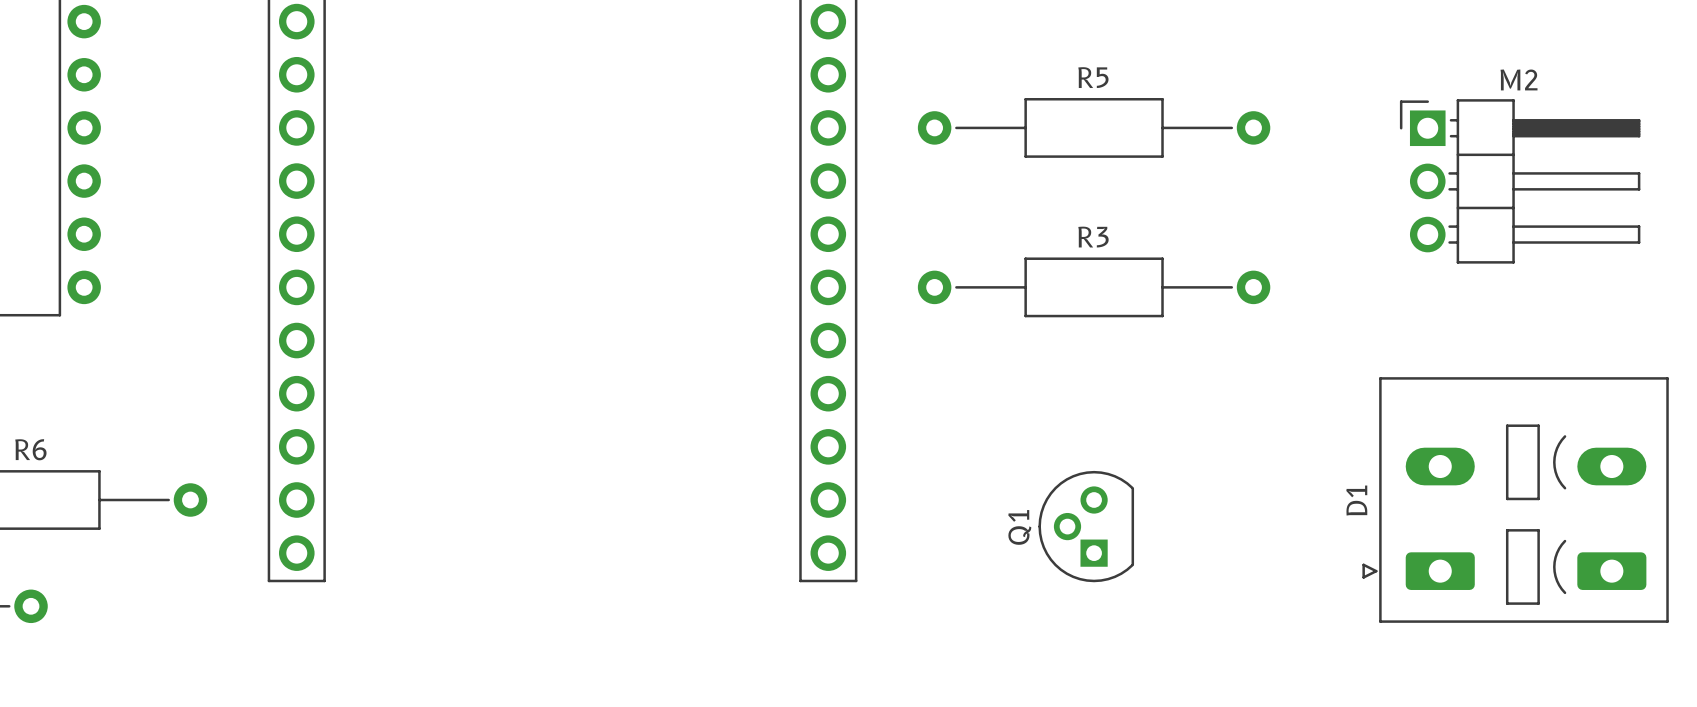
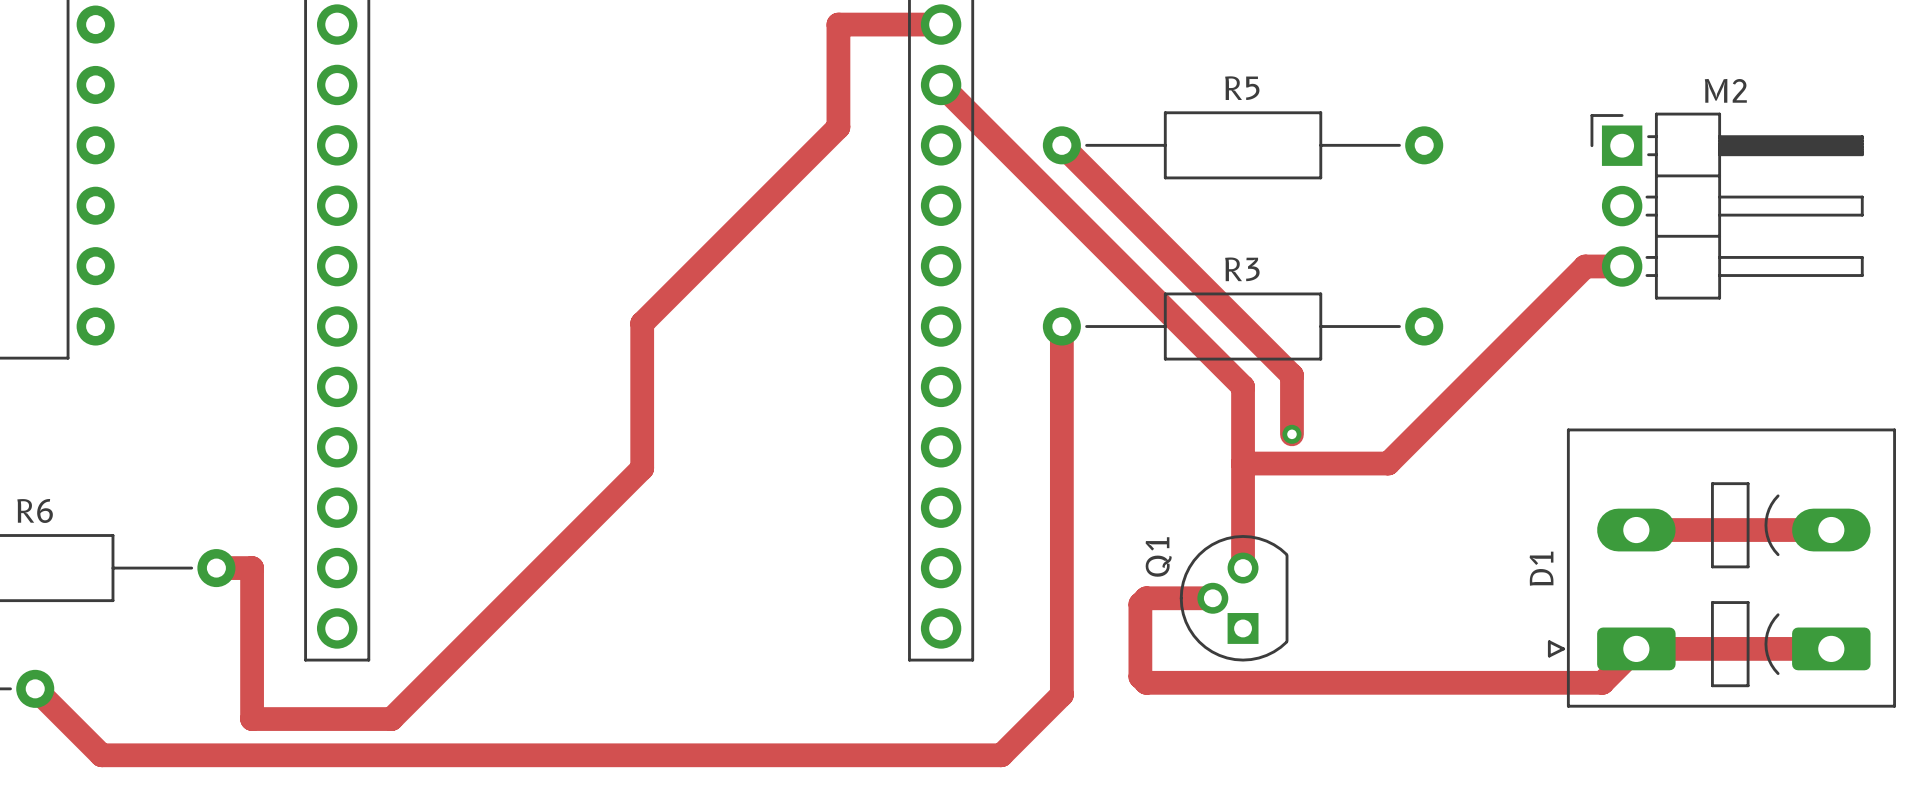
track: none -> (941, 24) (838, 24) (838, 127) (642, 323) (642, 468) (391, 719) (252, 719) (252, 568) (216, 568)
track: none -> (941, 84) (1243, 386) (1243, 568)
track: none -> (1061, 145) (1291, 375) (1291, 434)
track: none -> (1622, 266) (1585, 266) (1388, 463) (1243, 463)
track: none -> (1061, 326) (1061, 694) (1001, 755) (101, 755) (35, 688)
via: none -> (1291, 434)
track: none -> (1636, 530) (1831, 530)
Q1 name position: Q1 (1019, 527) -> Q1 (1158, 556)
track: none -> (1210, 600) (1212, 598) (1146, 598) (1140, 604) (1140, 676) (1146, 682) (1602, 682) (1636, 648) (1831, 648)

